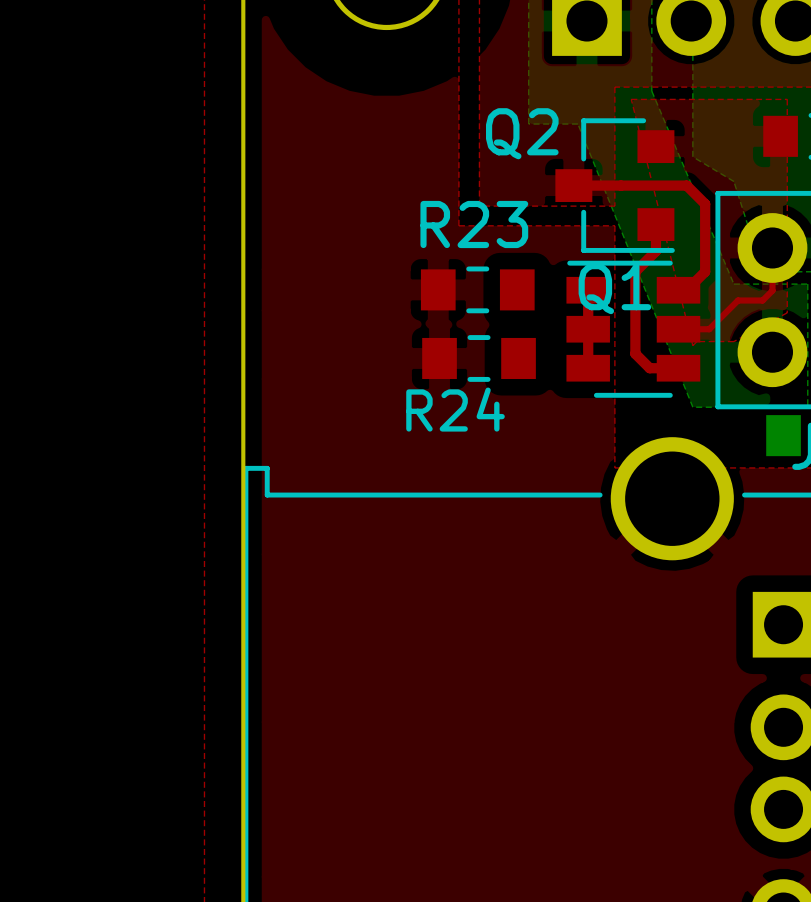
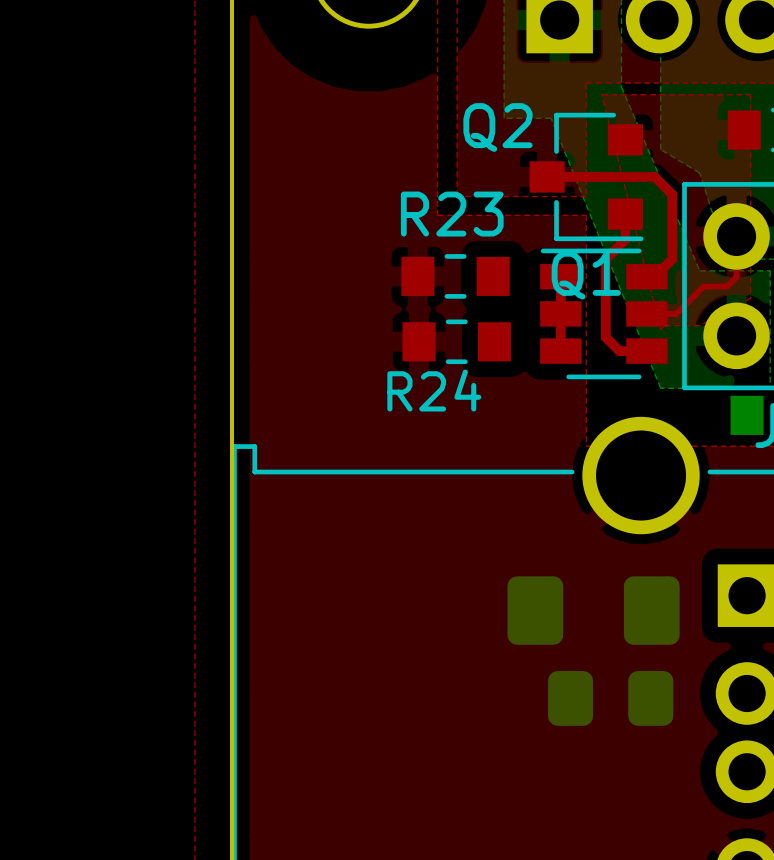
part: none -> (593, 610)
part: none -> (610, 698)

